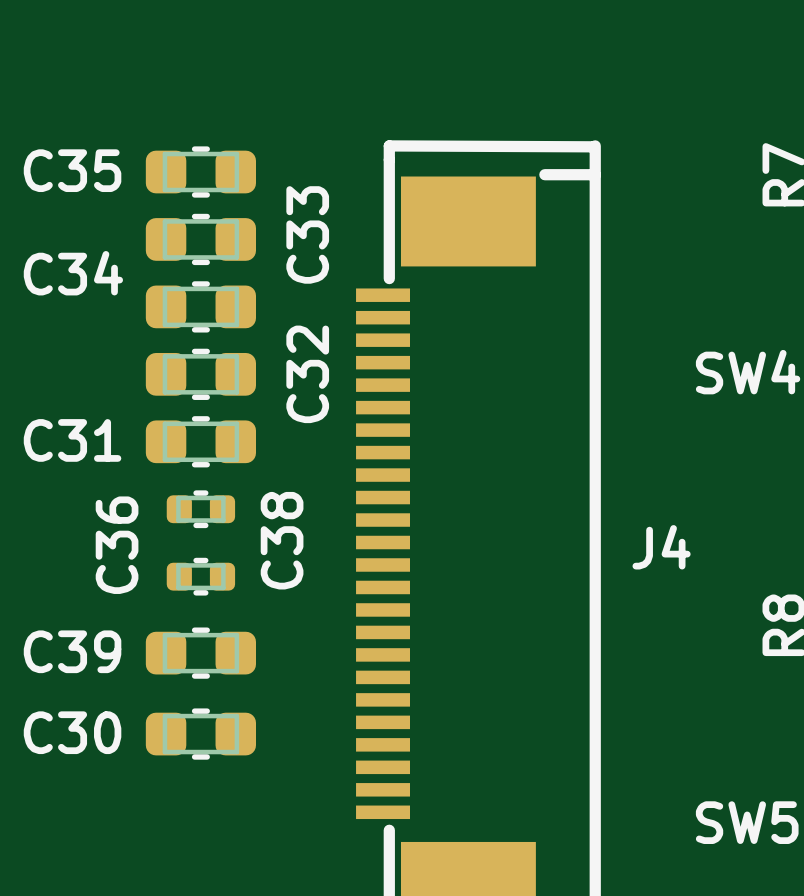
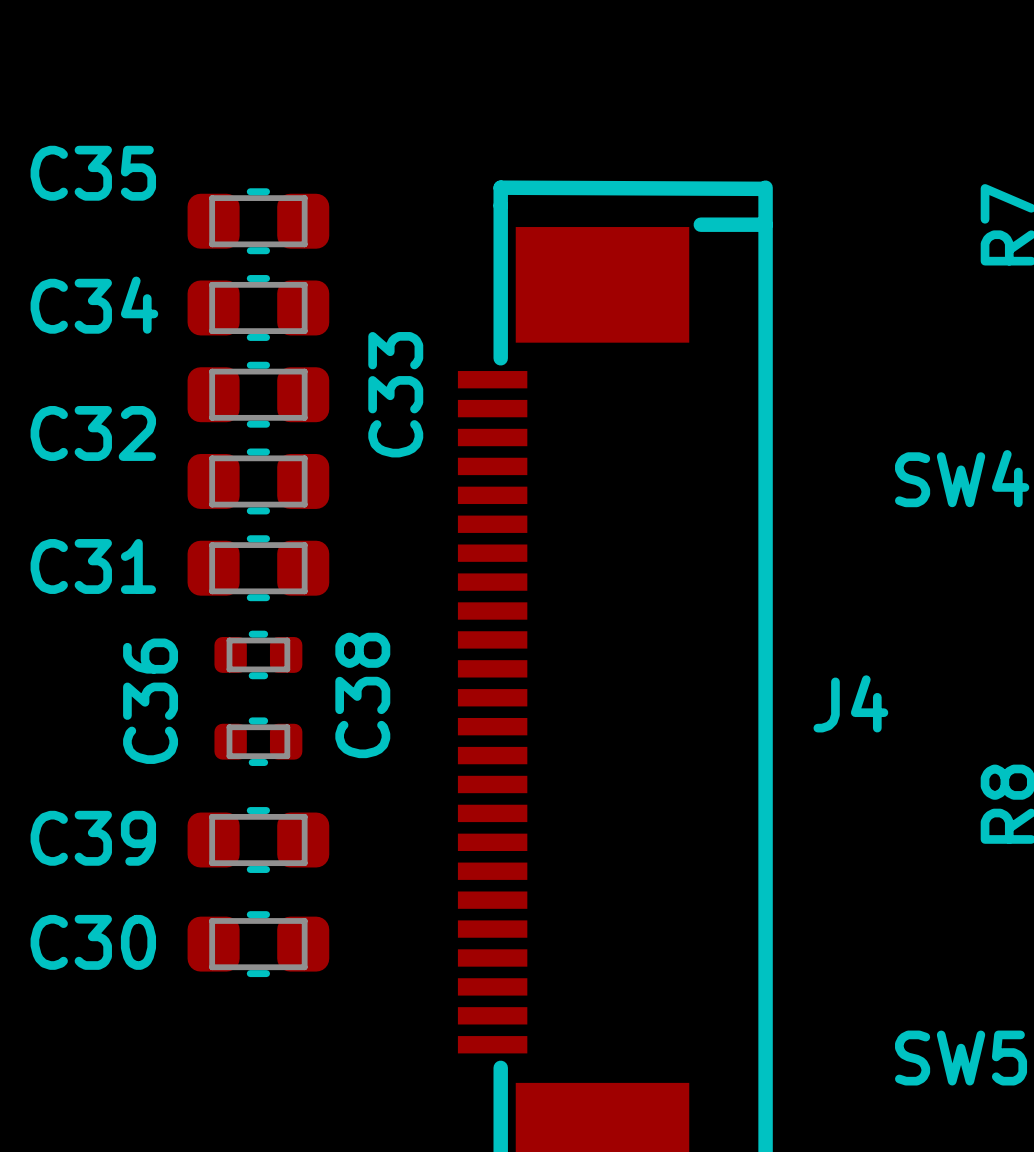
C35 name position: C35 (72, 170) -> C35 (93, 173)
C33 name position: C33 (307, 234) -> C33 (395, 394)
C34 name position: C34 (73, 273) -> C34 (94, 305)
C32 name rotation: 0° (307, 374) -> 90° clockwise (93, 433)
C32 name position: C32 (307, 374) -> C32 (93, 433)

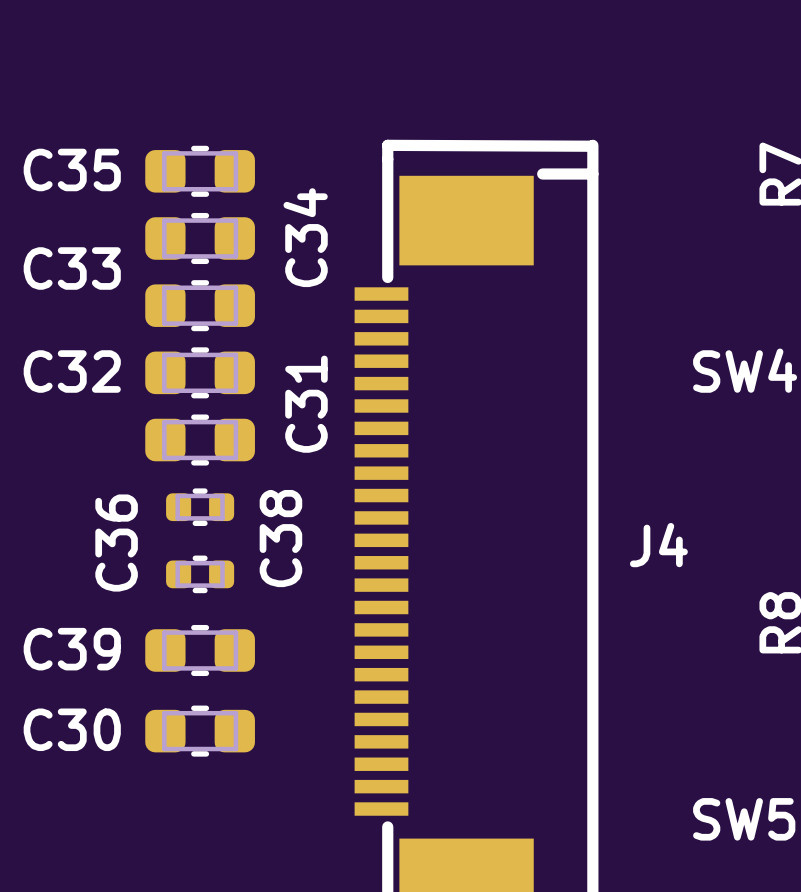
C35 name position: C35 (93, 173) -> C35 (72, 169)
C34 name rotation: 0° (94, 305) -> 90° counterclockwise (305, 237)
C34 name position: C34 (94, 305) -> C34 (305, 237)
C33 name rotation: 0° (395, 394) -> 90° clockwise (72, 268)
C33 name position: C33 (395, 394) -> C33 (72, 268)
C32 name position: C32 (93, 433) -> C32 (72, 371)
C31 name rotation: 0° (93, 566) -> 90° counterclockwise (306, 404)
C31 name position: C31 (93, 566) -> C31 (306, 404)

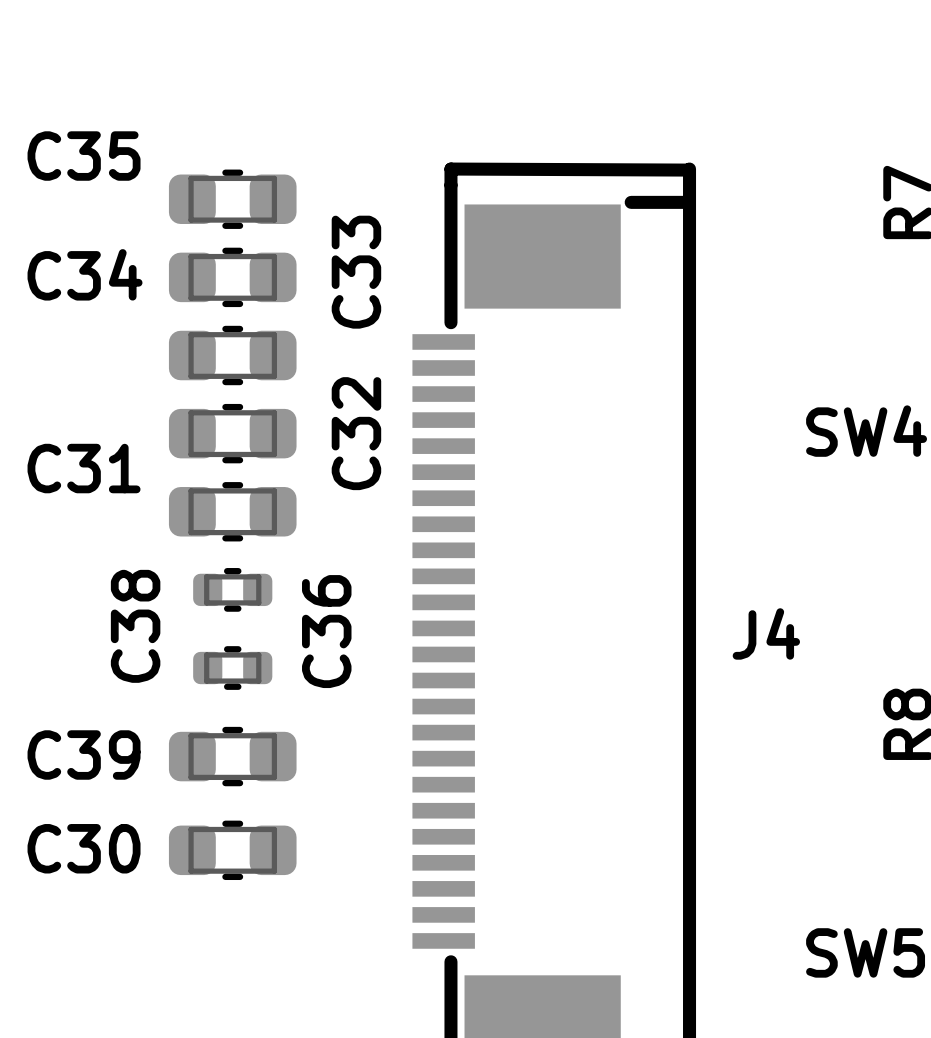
C35 name position: C35 (72, 169) -> C35 (84, 156)
C34 name rotation: 0° (305, 237) -> 90° clockwise (85, 274)
C34 name position: C34 (305, 237) -> C34 (85, 274)
C33 name rotation: 0° (72, 268) -> 90° counterclockwise (356, 272)
C33 name position: C33 (72, 268) -> C33 (356, 272)
C32 name rotation: 0° (72, 371) -> 90° counterclockwise (356, 433)
C32 name position: C32 (72, 371) -> C32 (356, 433)
C31 name rotation: 0° (306, 404) -> 90° clockwise (84, 468)
C31 name position: C31 (306, 404) -> C31 (84, 468)
C38 name position: C38 (280, 538) -> C38 (135, 626)
C36 name position: C36 (116, 543) -> C36 (326, 631)

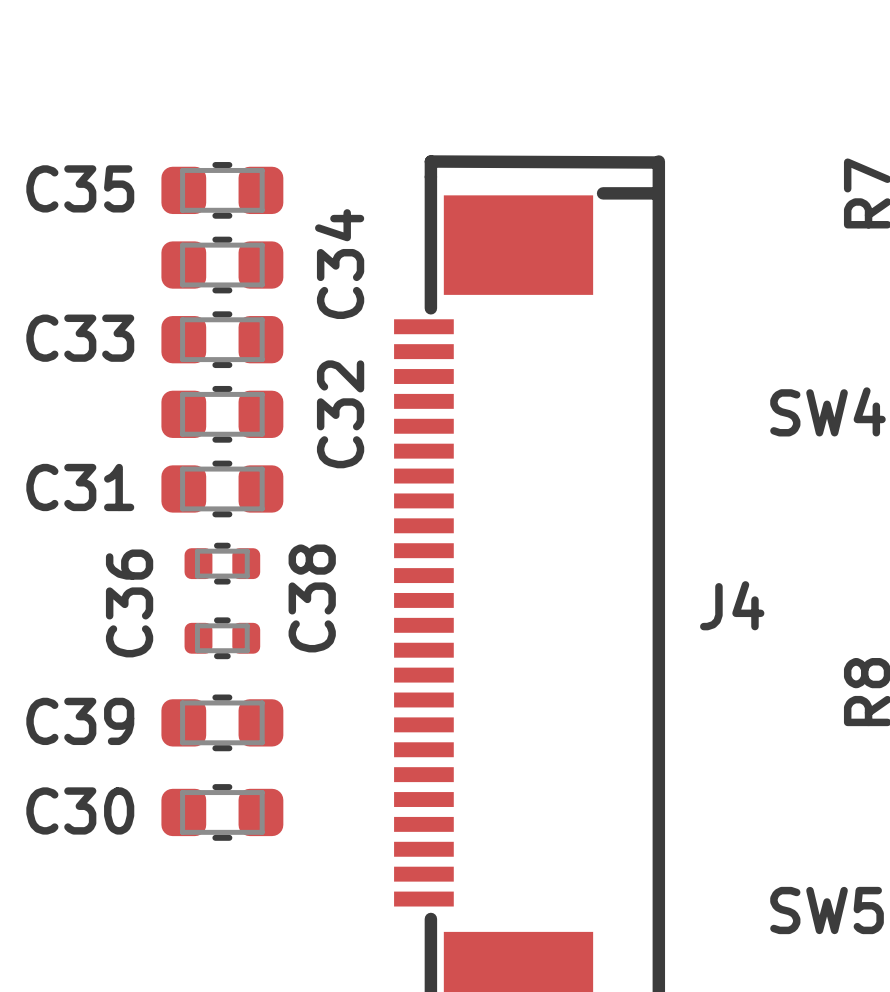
C35 name position: C35 (84, 156) -> C35 (80, 188)
C33 name rotation: 0° (356, 272) -> 90° clockwise (80, 338)
C33 name position: C33 (356, 272) -> C33 (80, 338)
C34 name rotation: 0° (85, 274) -> 90° counterclockwise (339, 264)
C34 name position: C34 (85, 274) -> C34 (339, 264)
C31 name position: C31 (84, 468) -> C31 (80, 487)
C38 name position: C38 (135, 626) -> C38 (312, 598)
C36 name position: C36 (326, 631) -> C36 (129, 603)

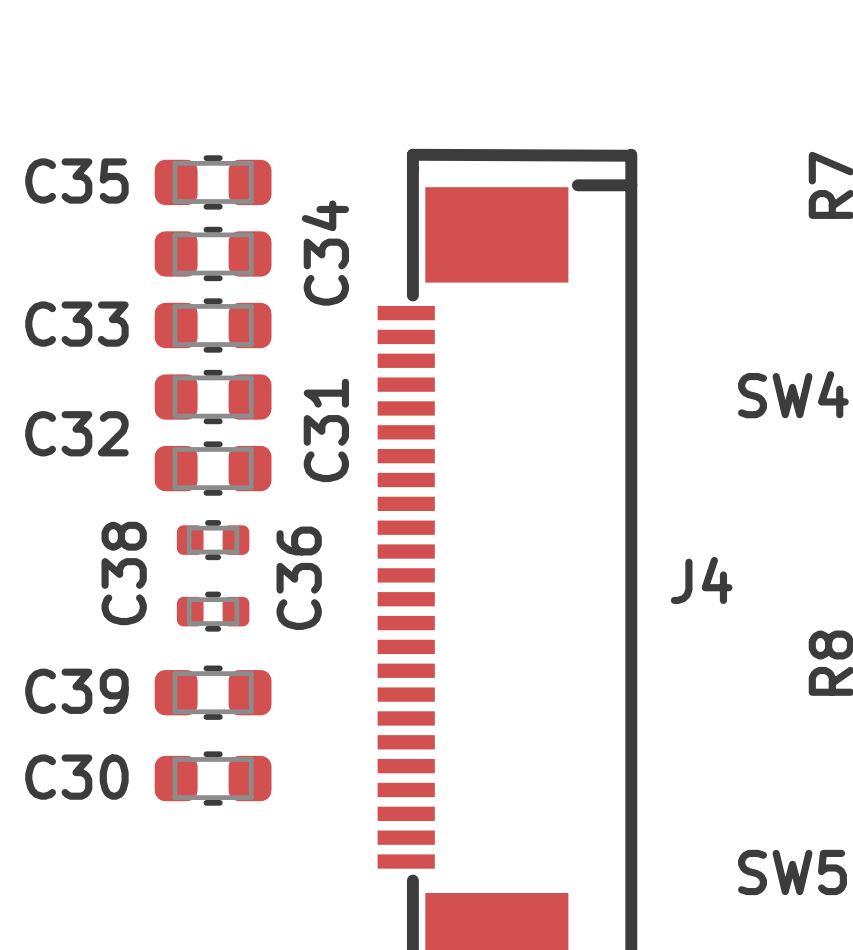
C32 name rotation: 0° (340, 414) -> 90° clockwise (76, 433)
C32 name position: C32 (340, 414) -> C32 (76, 433)
C31 name rotation: 0° (80, 487) -> 90° counterclockwise (326, 430)
C31 name position: C31 (80, 487) -> C31 (326, 430)
C38 name position: C38 (312, 598) -> C38 (124, 573)
C36 name position: C36 (129, 603) -> C36 (299, 578)

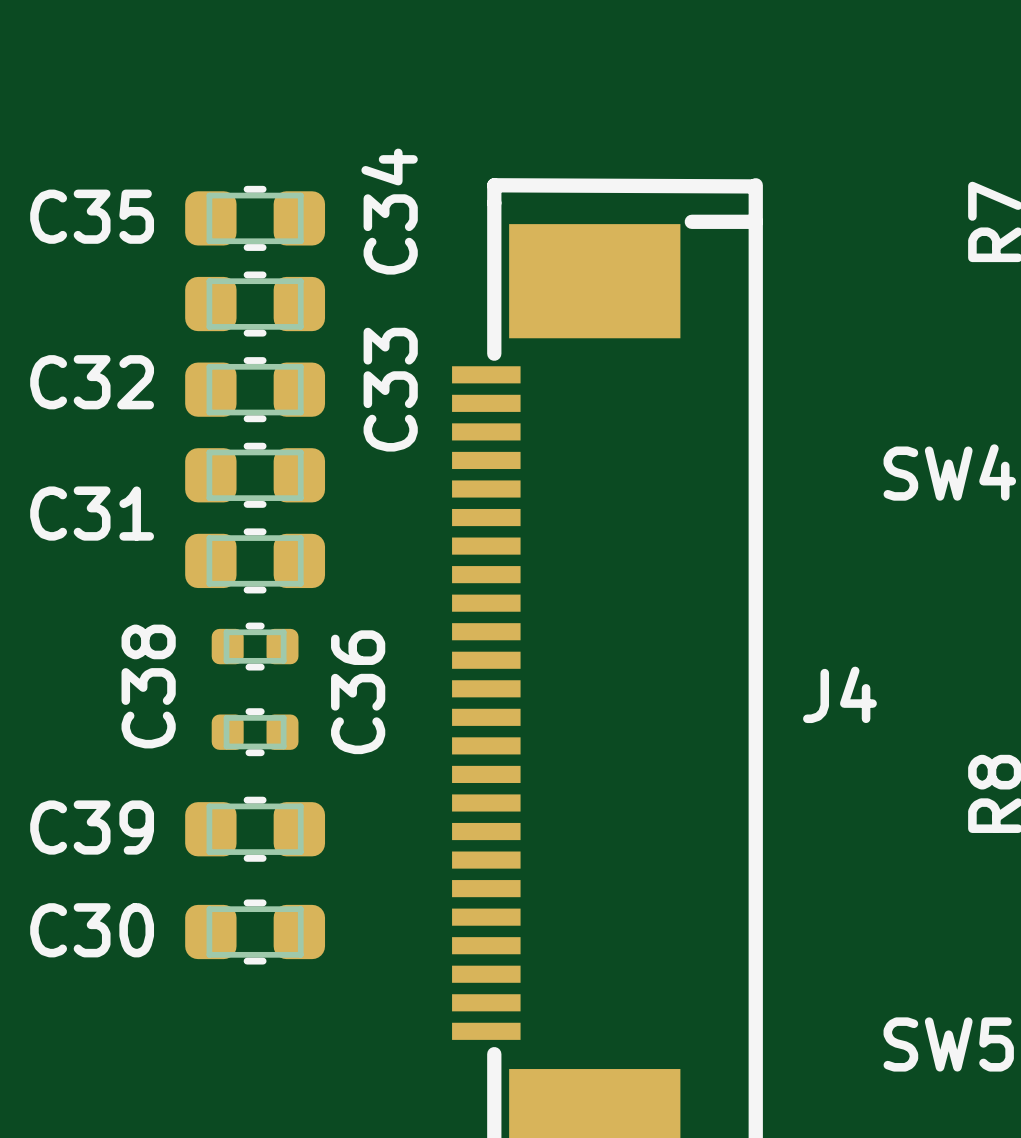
C34 name position: C34 (325, 253) -> C34 (389, 211)
C33 name rotation: 0° (76, 324) -> 90° counterclockwise (390, 389)
C33 name position: C33 (76, 324) -> C33 (390, 389)
C31 name rotation: 0° (326, 430) -> 90° clockwise (92, 513)
C31 name position: C31 (326, 430) -> C31 (92, 513)
C32 name position: C32 (76, 433) -> C32 (92, 382)

